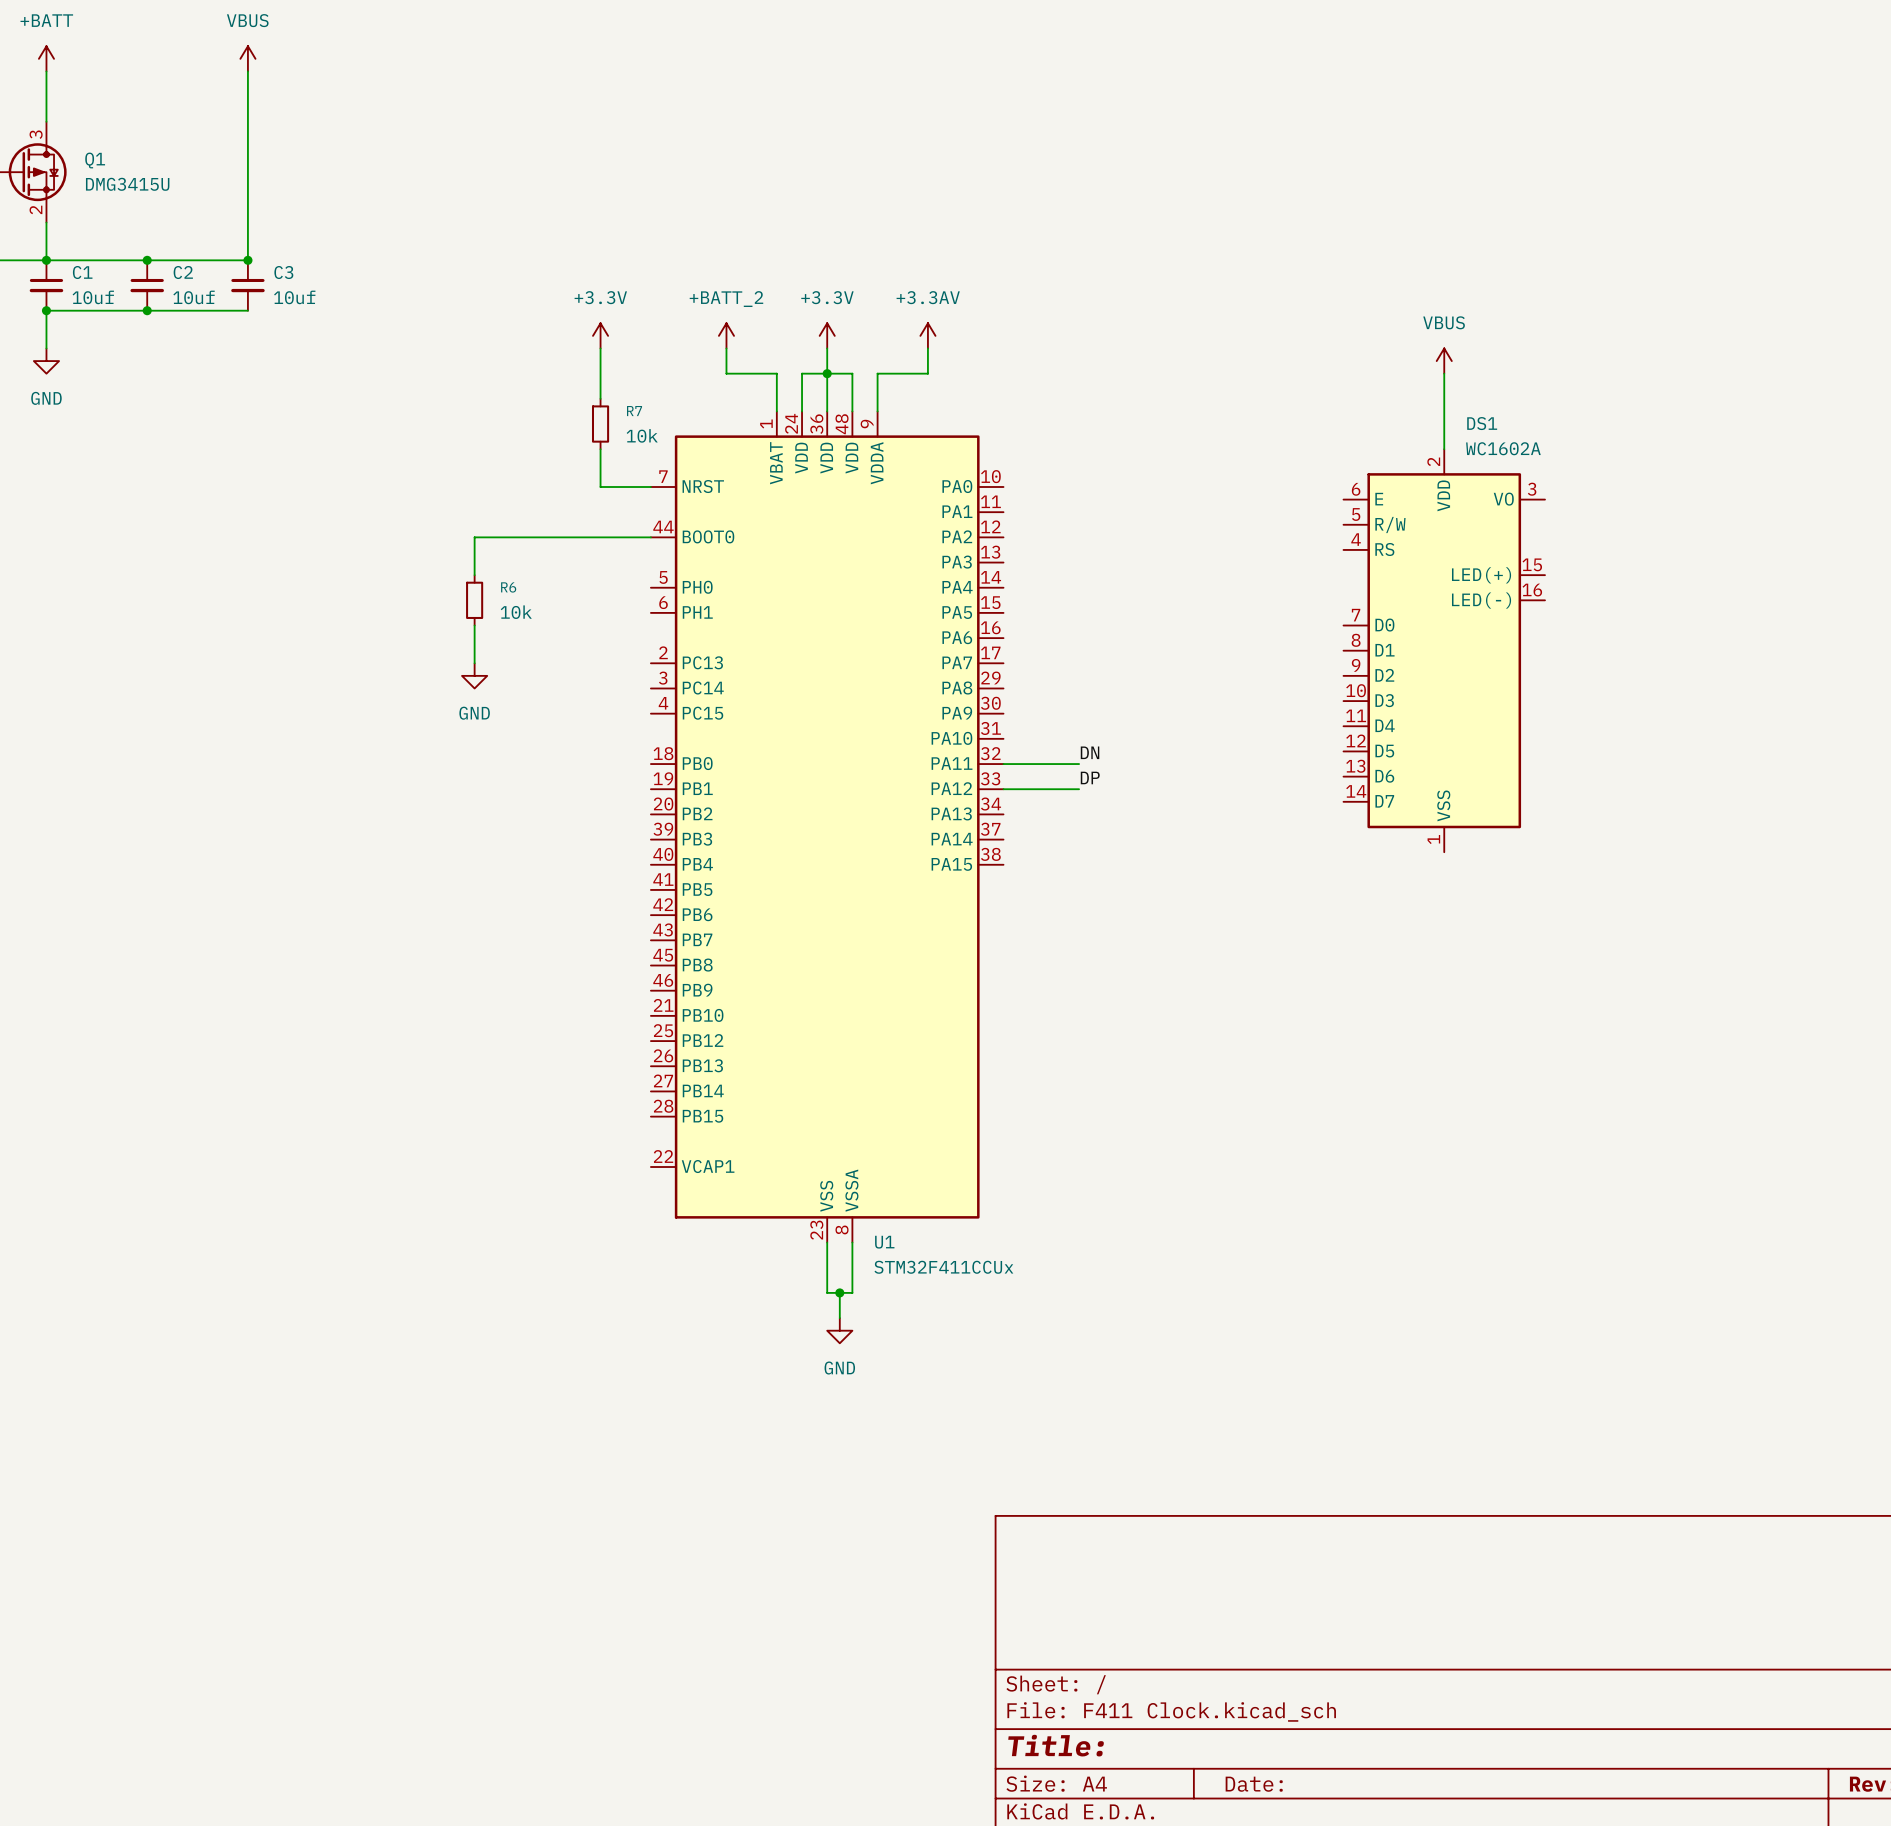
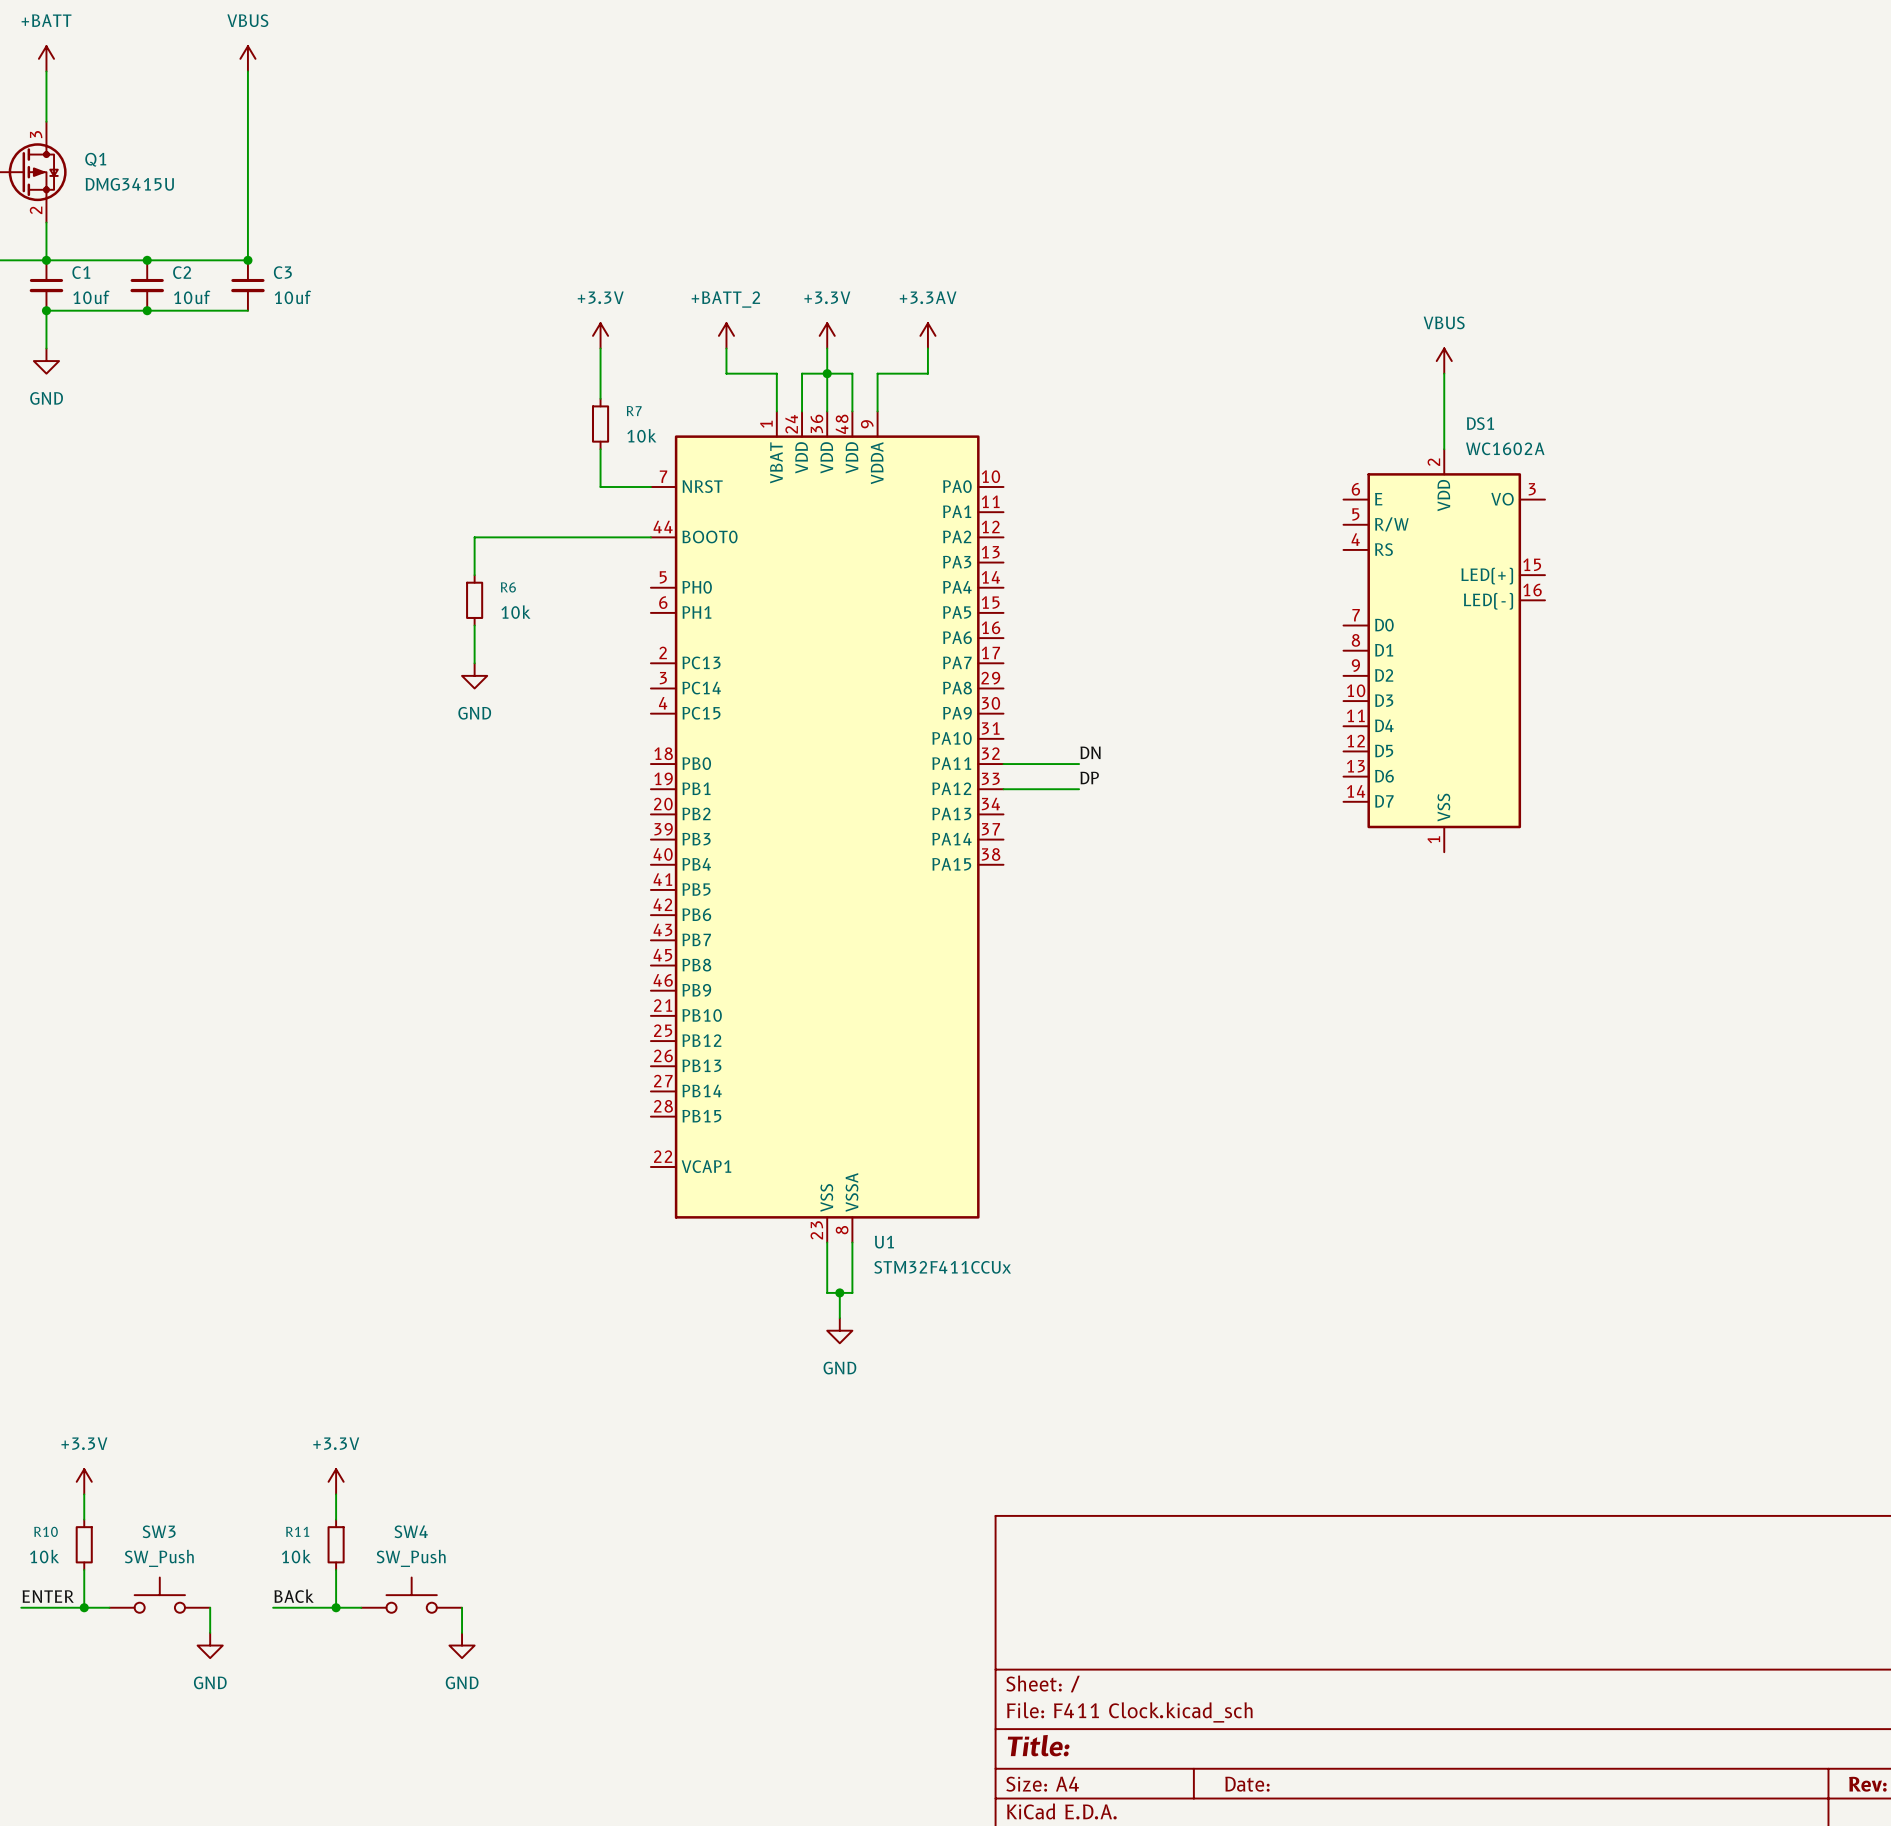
power symbol: none -> +3.3V (84, 1481)
power symbol: none -> +3.3V (336, 1481)
wire: none -> (84, 1494) (84, 1519)
wire: none -> (336, 1494) (336, 1519)
R10: none -> 10k (84, 1544)
R11: none -> 10k (336, 1544)
wire: none -> (84, 1569) (84, 1607)
wire: none -> (336, 1569) (336, 1607)
SW3: none -> SW_Push (159, 1595)
SW4: none -> SW_Push (411, 1595)
label: none -> ENTER (48, 1596)
label: none -> BACk (294, 1596)
wire: none -> (21, 1607) (109, 1607)
junction: none -> (84, 1607)
wire: none -> (210, 1607) (210, 1632)
wire: none -> (273, 1607) (361, 1607)
junction: none -> (336, 1607)
wire: none -> (462, 1607) (462, 1632)
power symbol: none -> GND (210, 1645)
power symbol: none -> GND (462, 1645)

